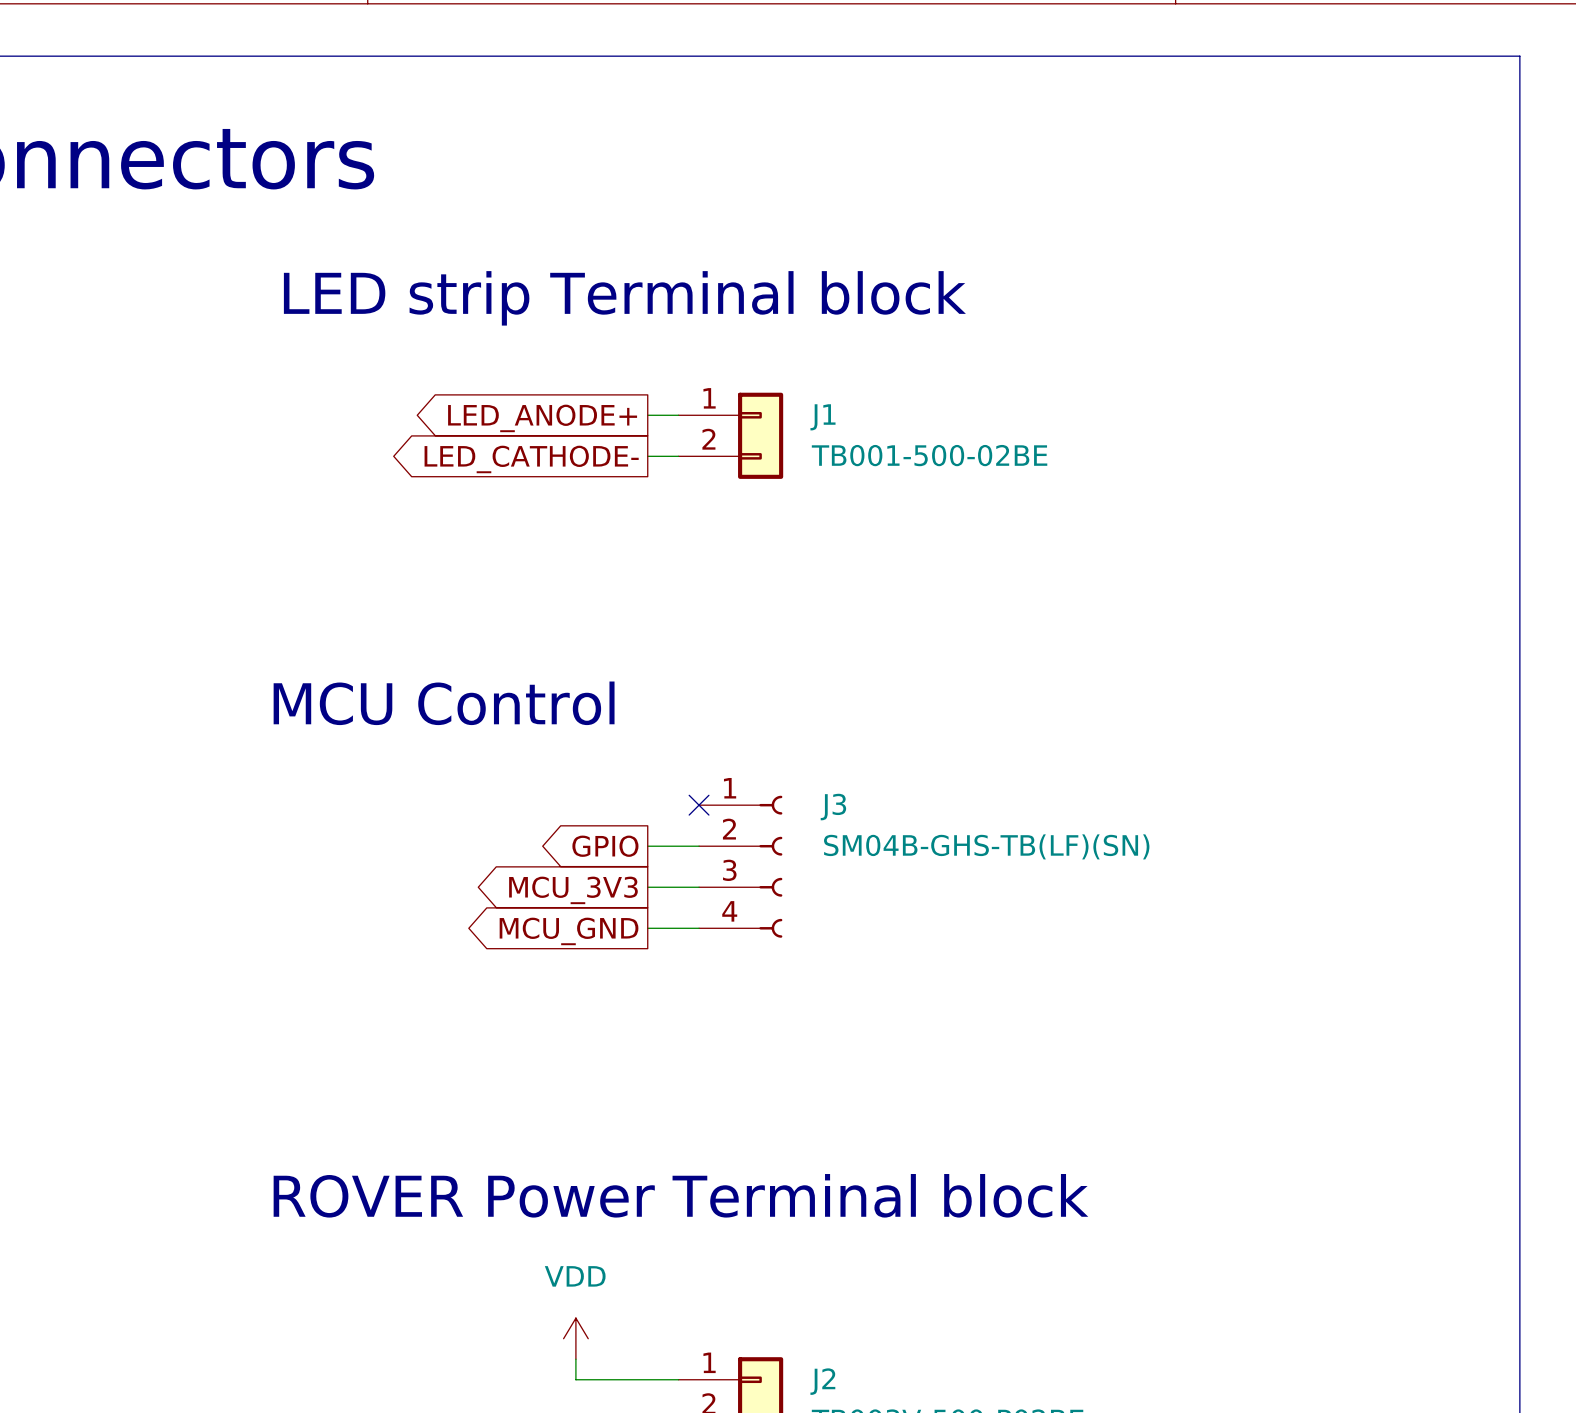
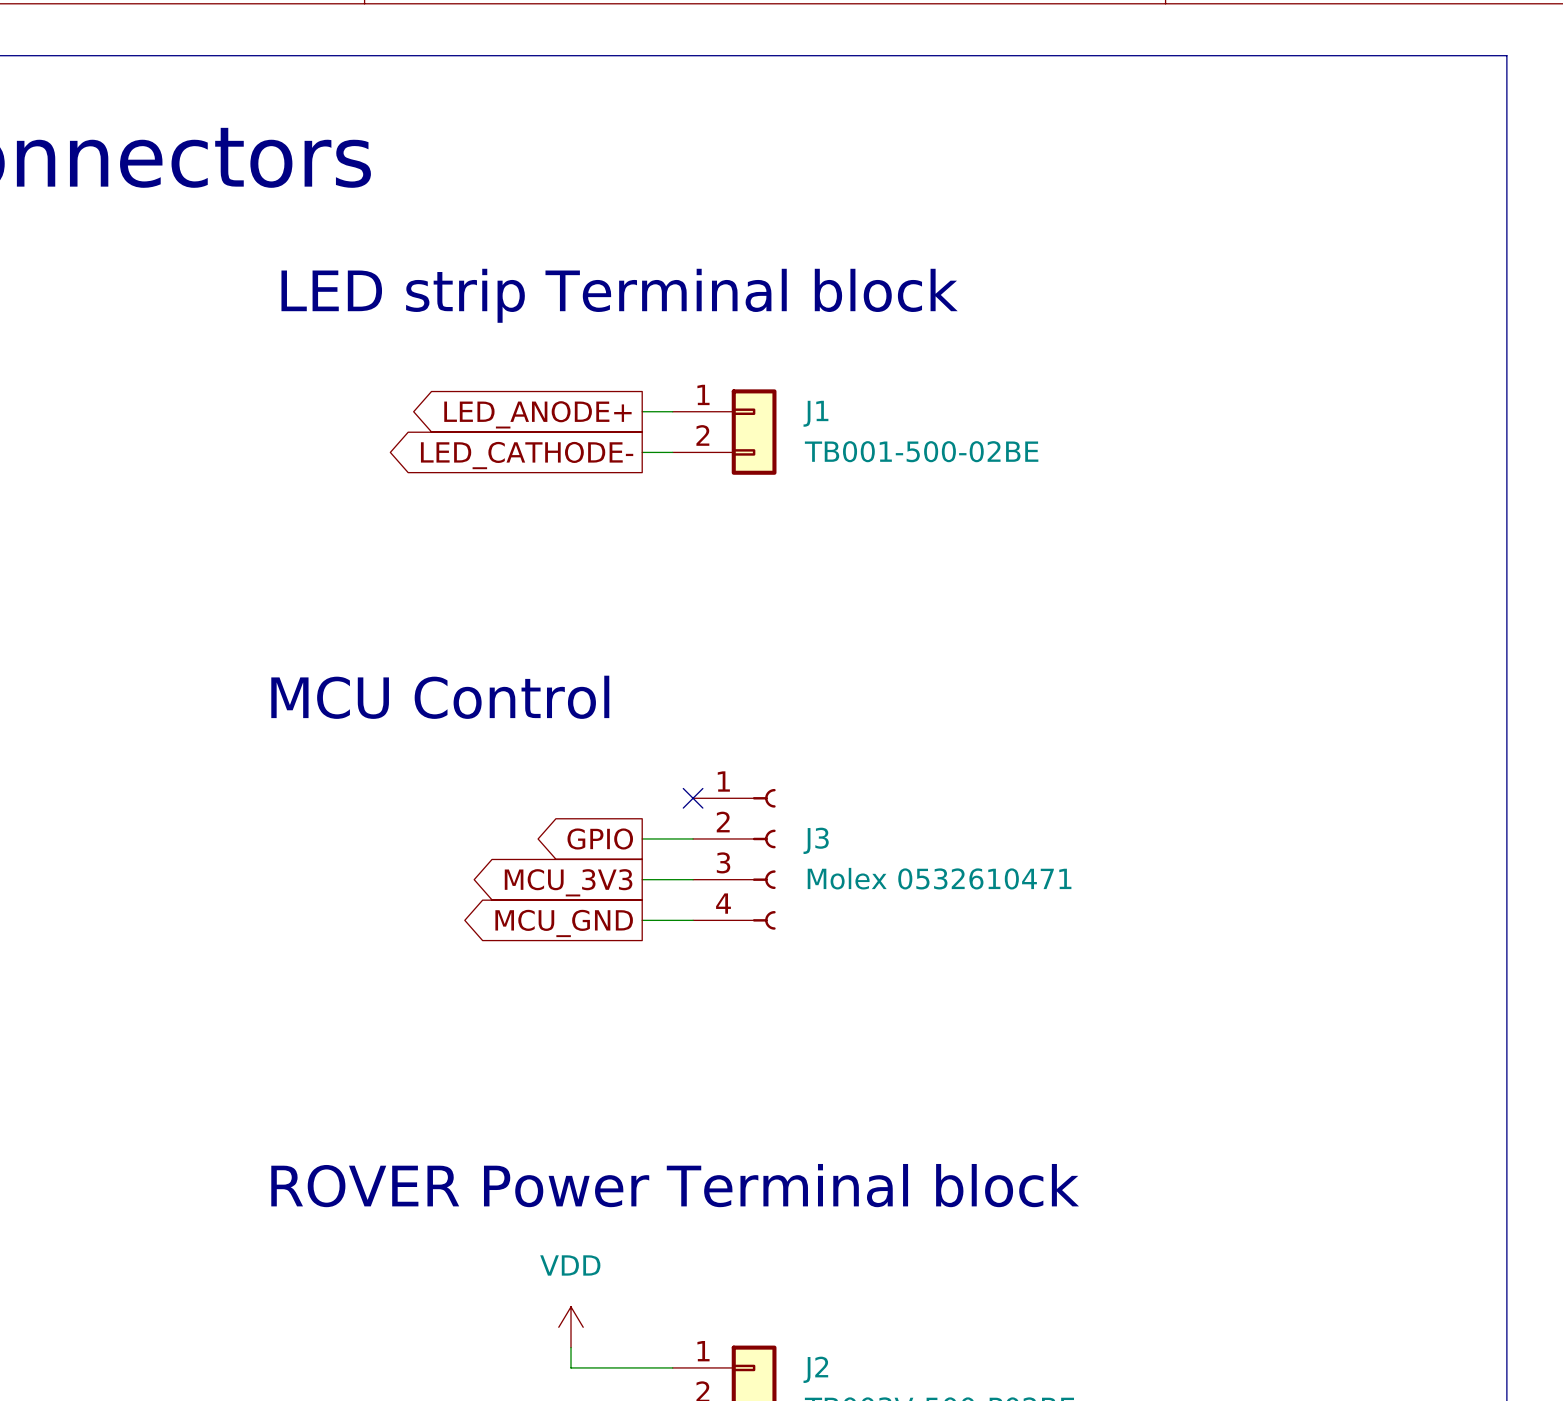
J3 name position: J3 (833, 807) -> J3 (816, 840)
J3 value: SM04B-GHS-TB(LF)(SN) (986, 846) -> Molex 0532610471 (939, 878)

